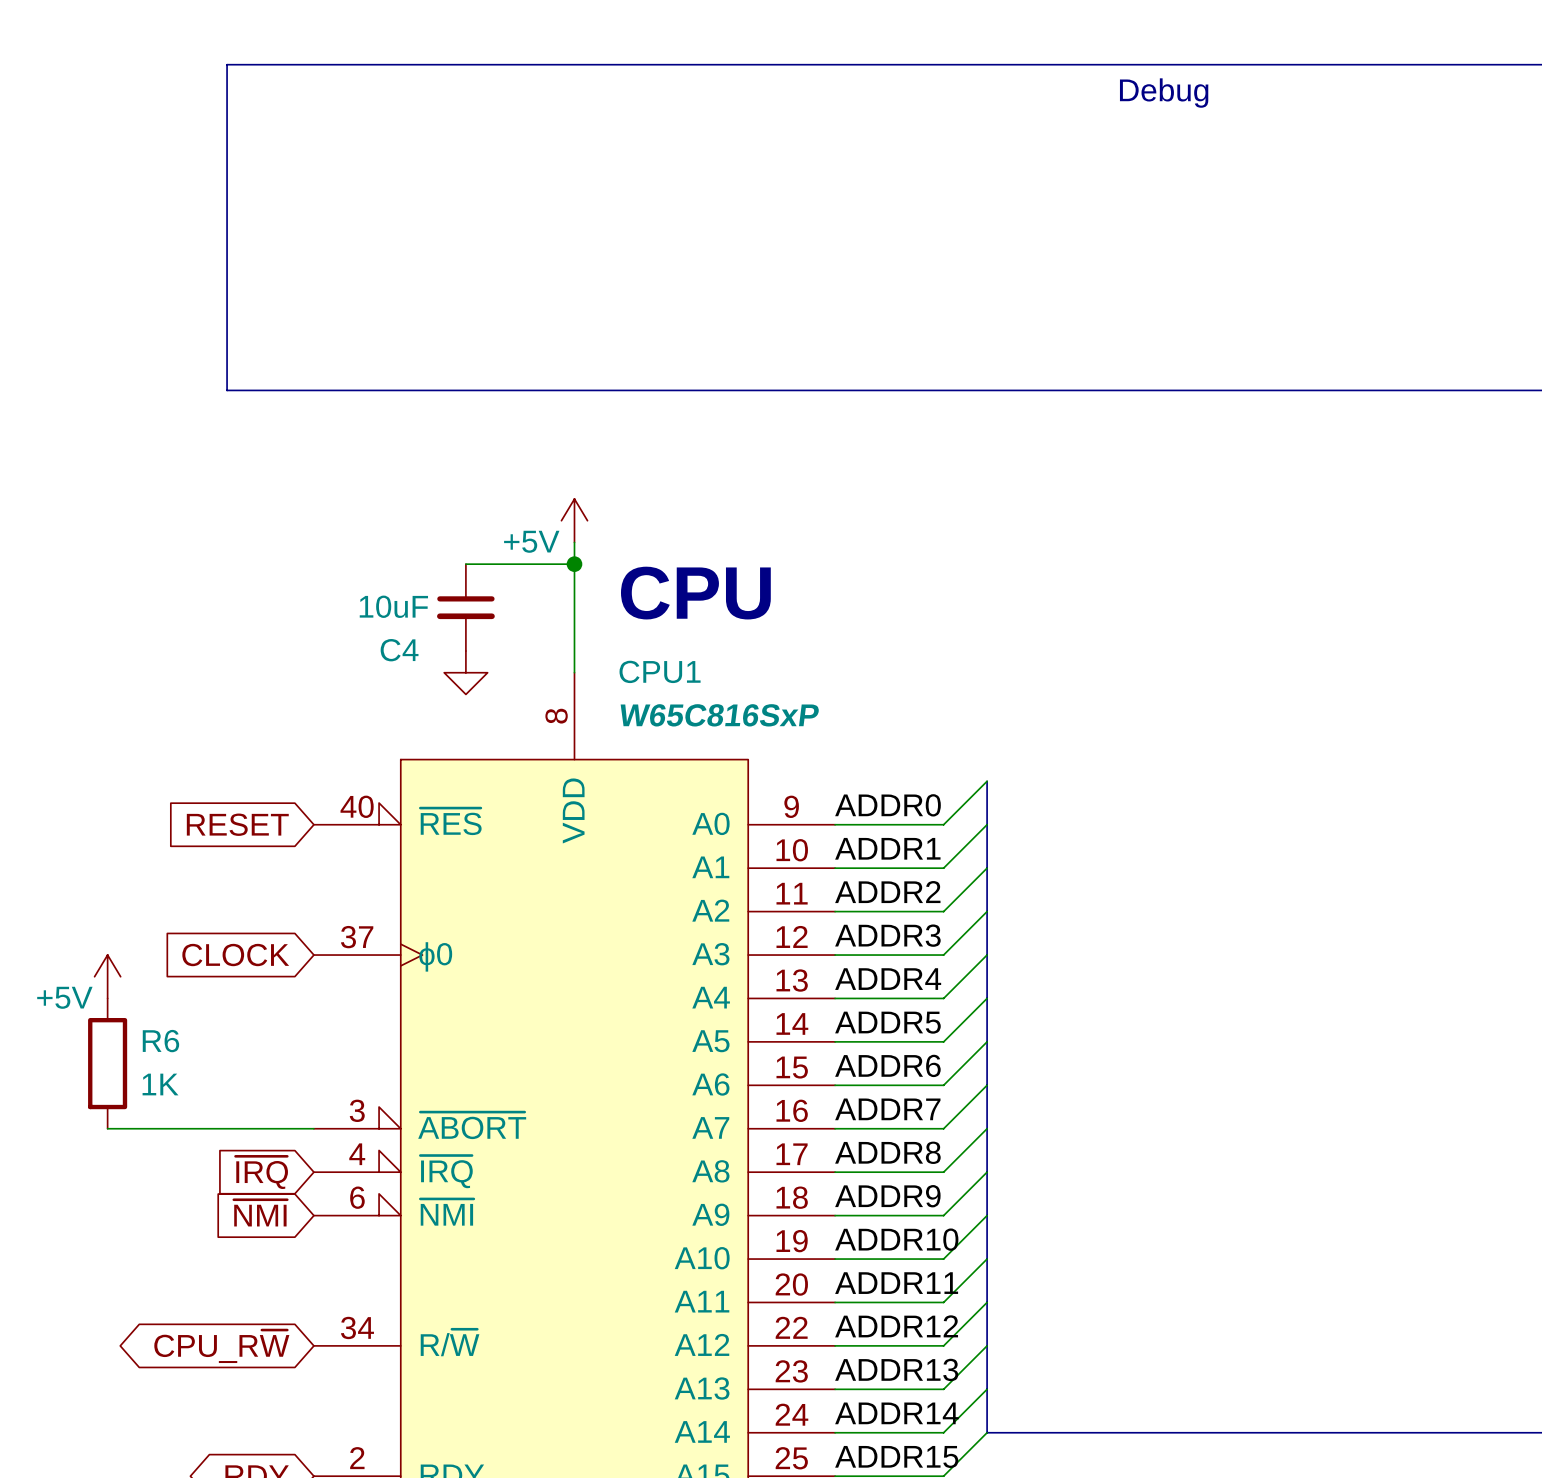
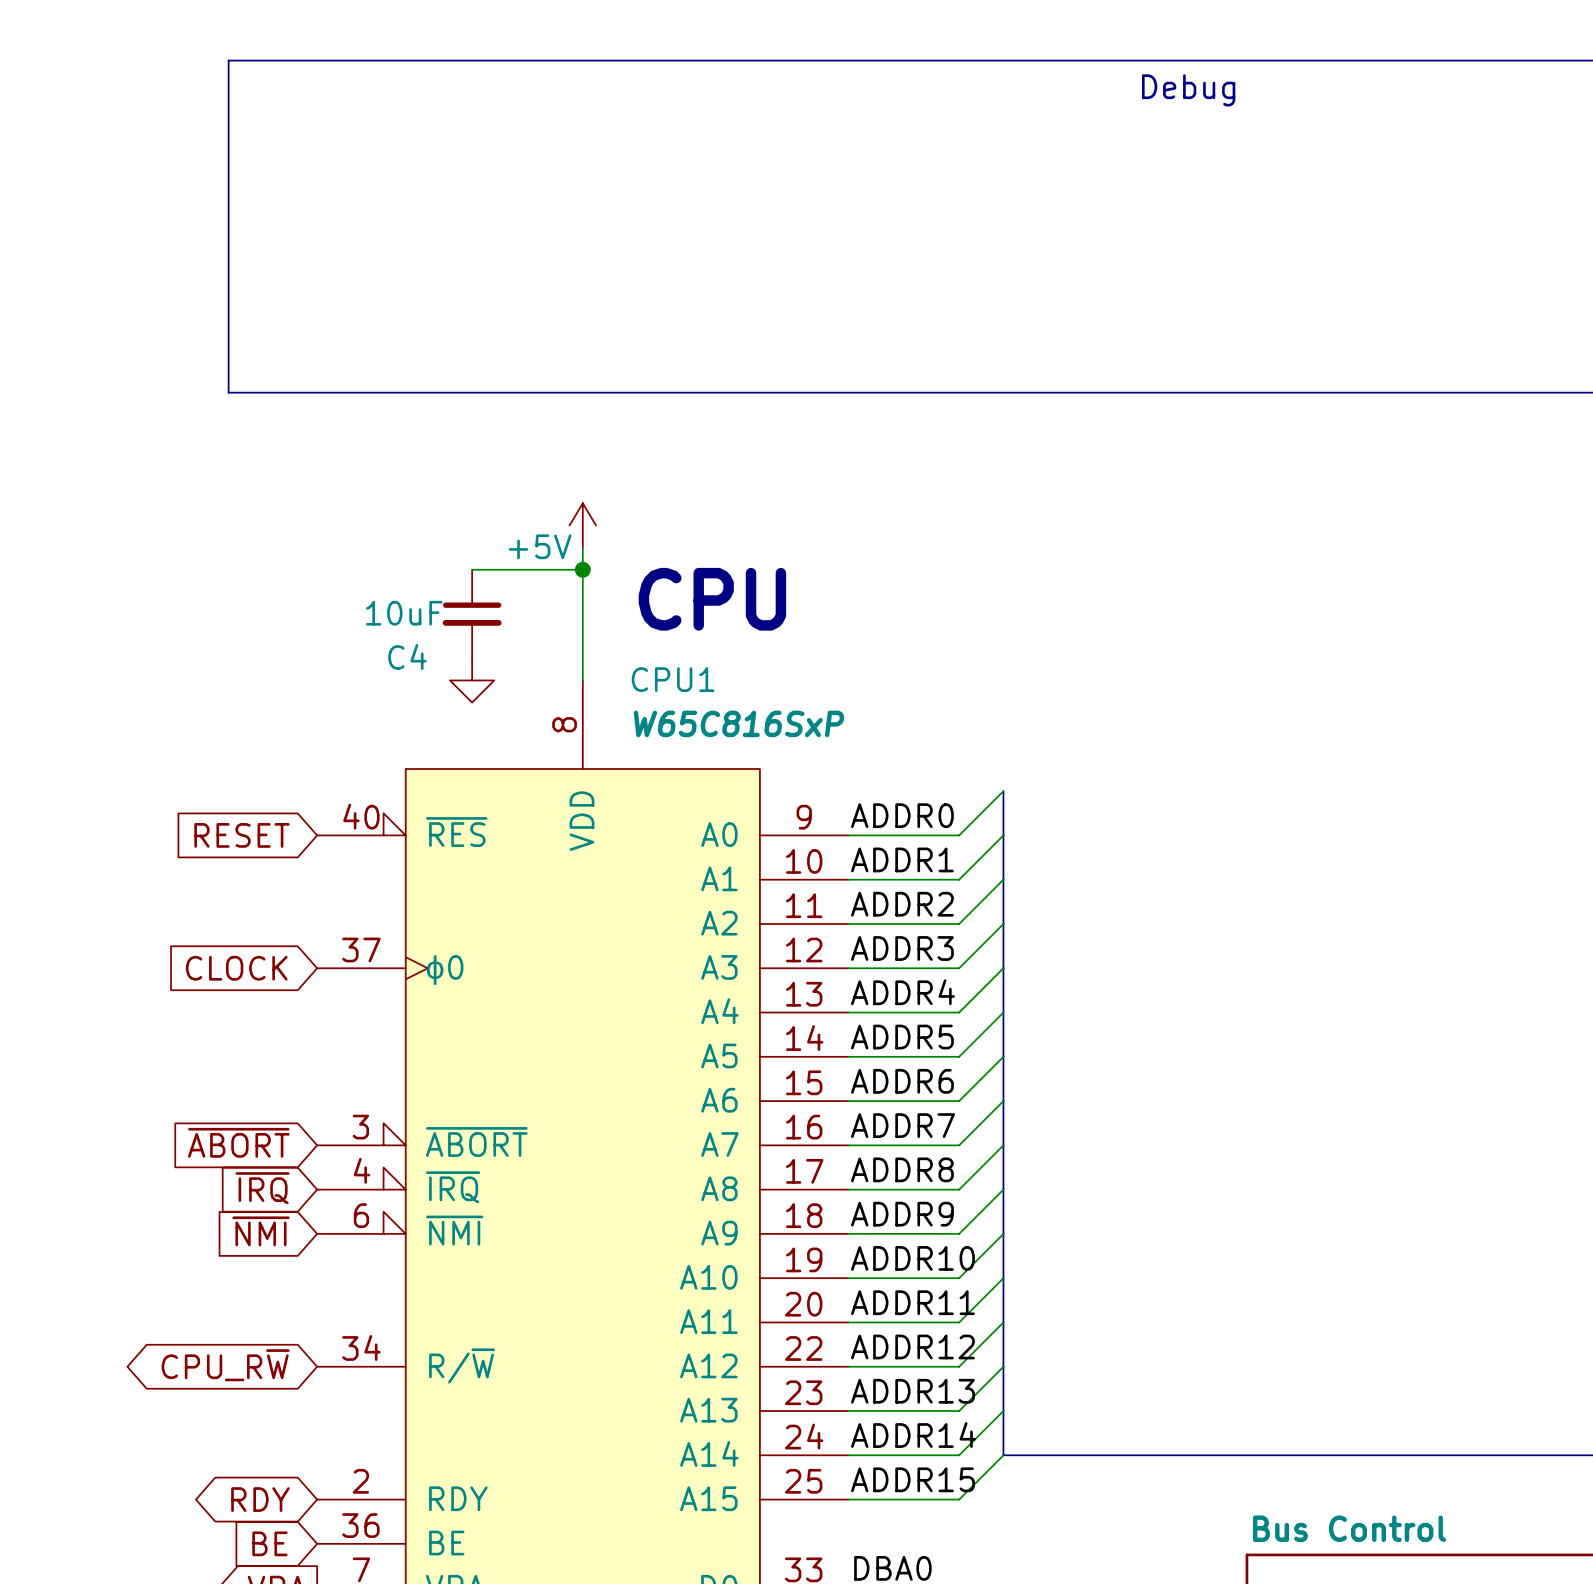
power symbol: +5V (107, 976) -> none
R6: 1K (107, 1063) -> none
global label: none -> ~{ABORT} (238, 1142)
wire: (107, 1128) (313, 1128) -> none

